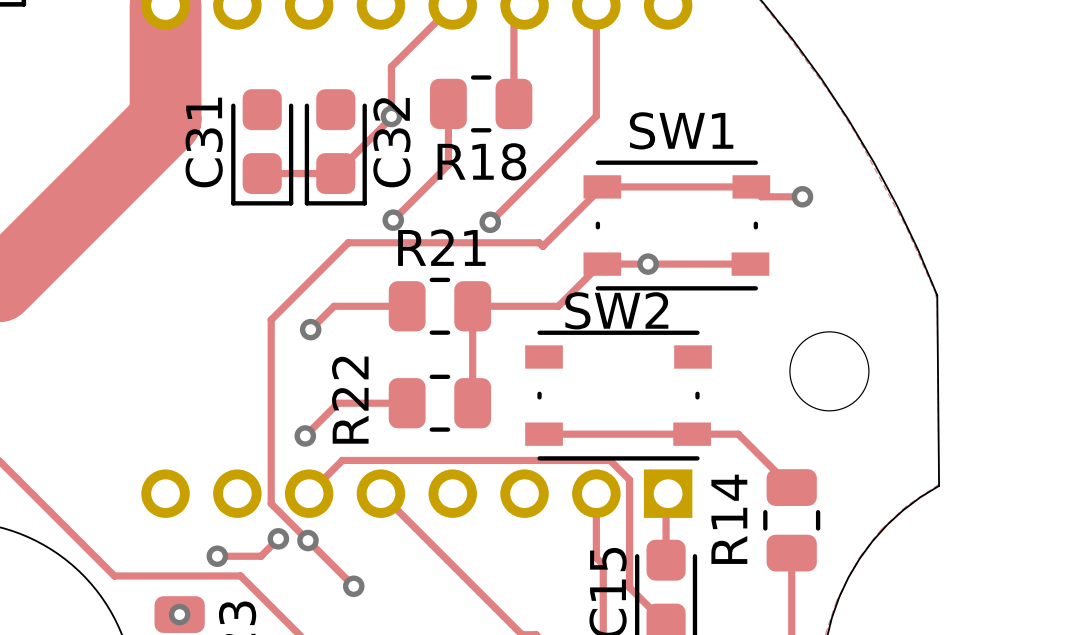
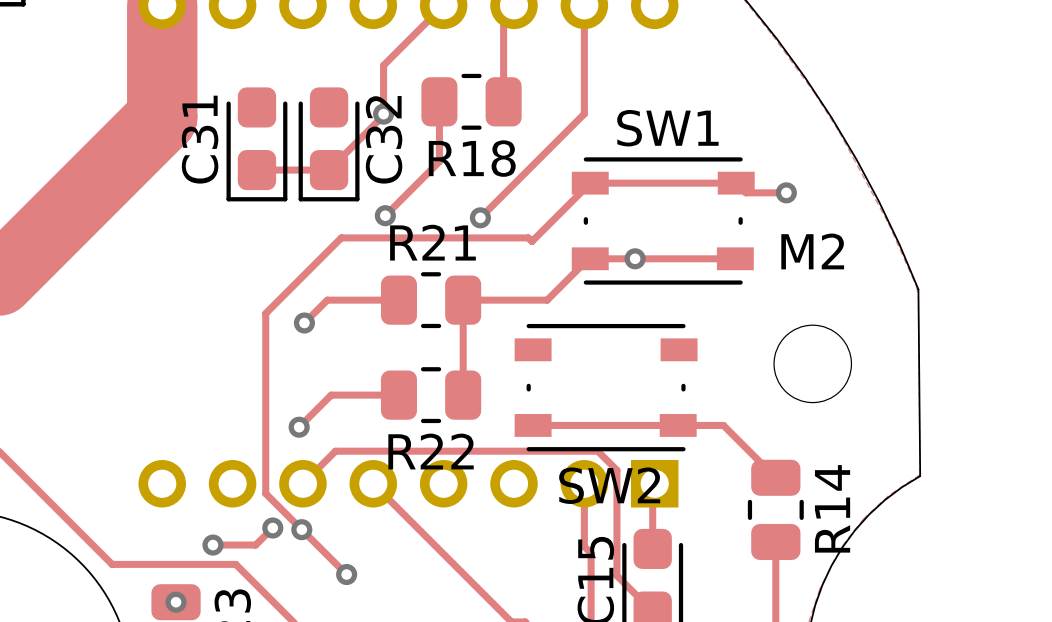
M2 name: none -> M2 (812, 251)
SW2 name position: SW2 (616, 310) -> SW2 (609, 485)
R22 name rotation: 0° (350, 400) -> 90° clockwise (431, 451)
R14 name position: R14 (729, 519) -> R14 (832, 508)

